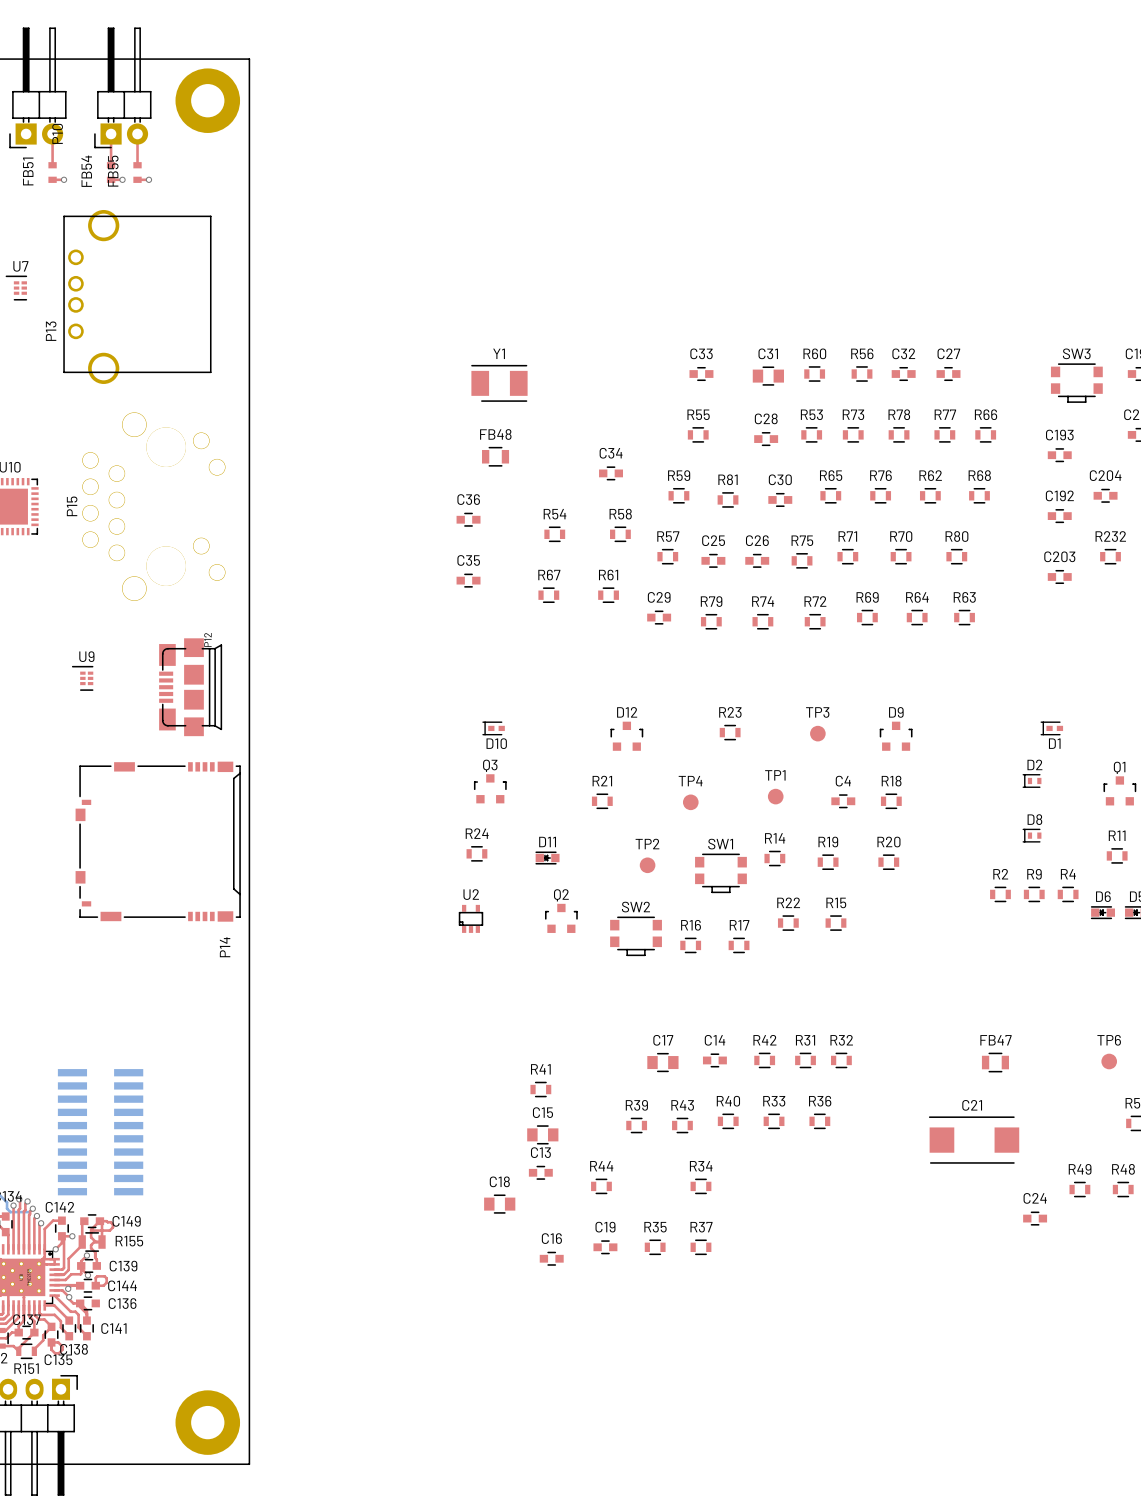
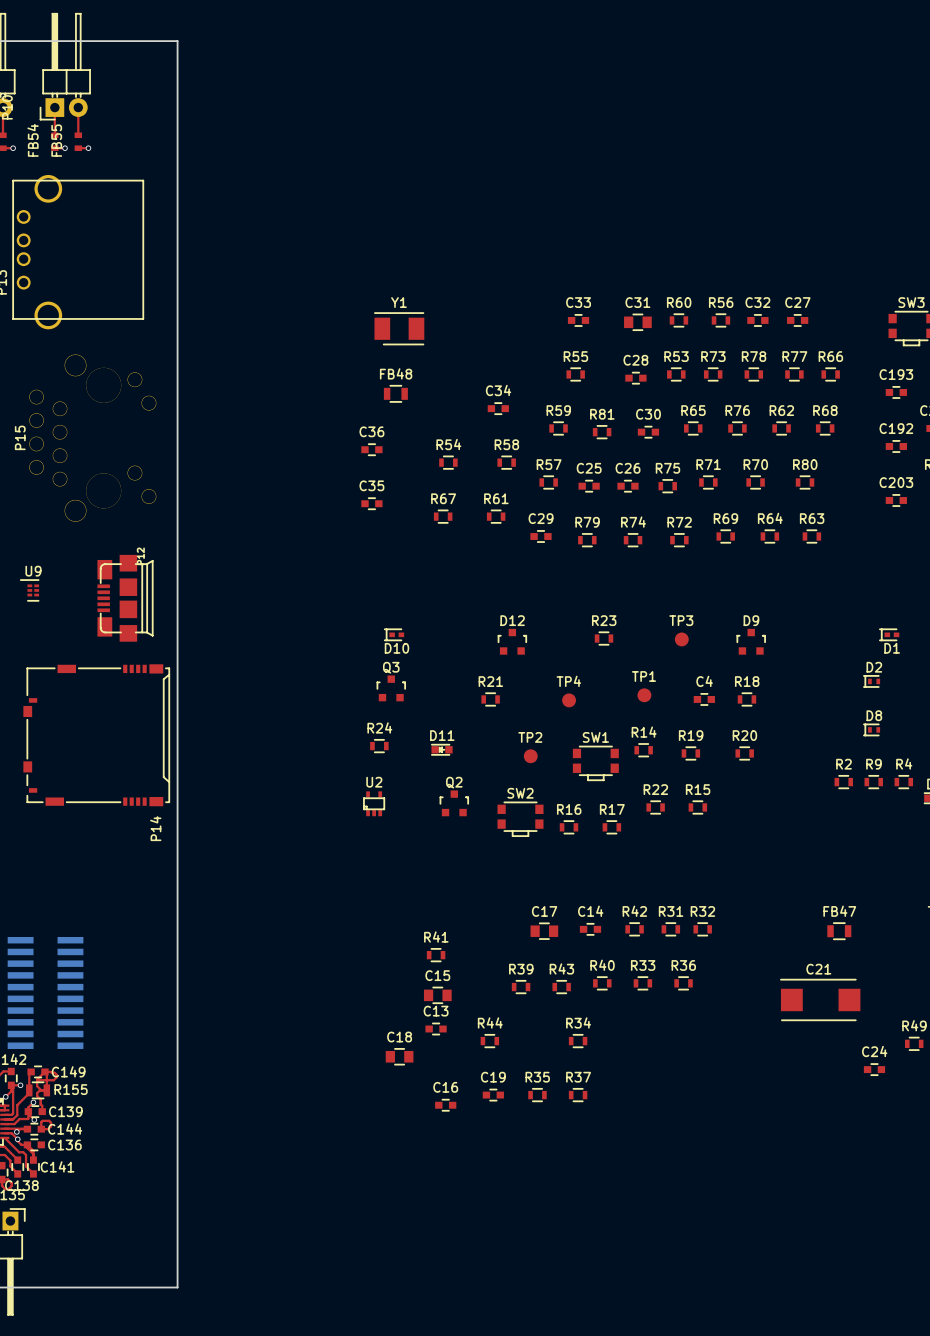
part: (207, 100) -> none
part: (207, 1422) -> none

